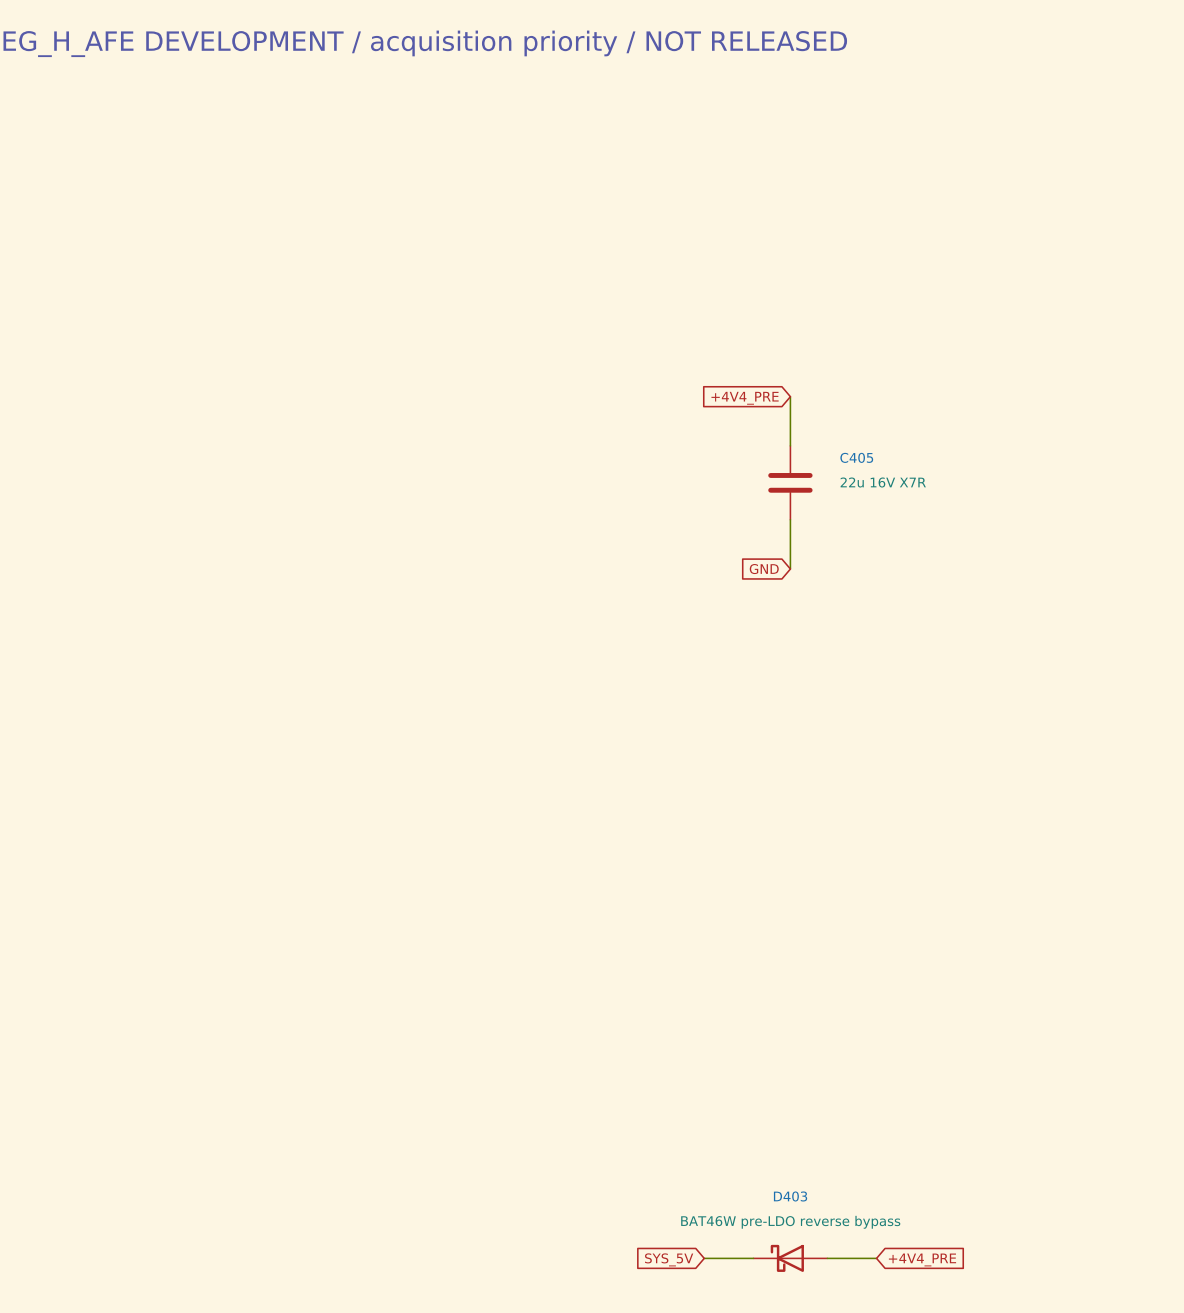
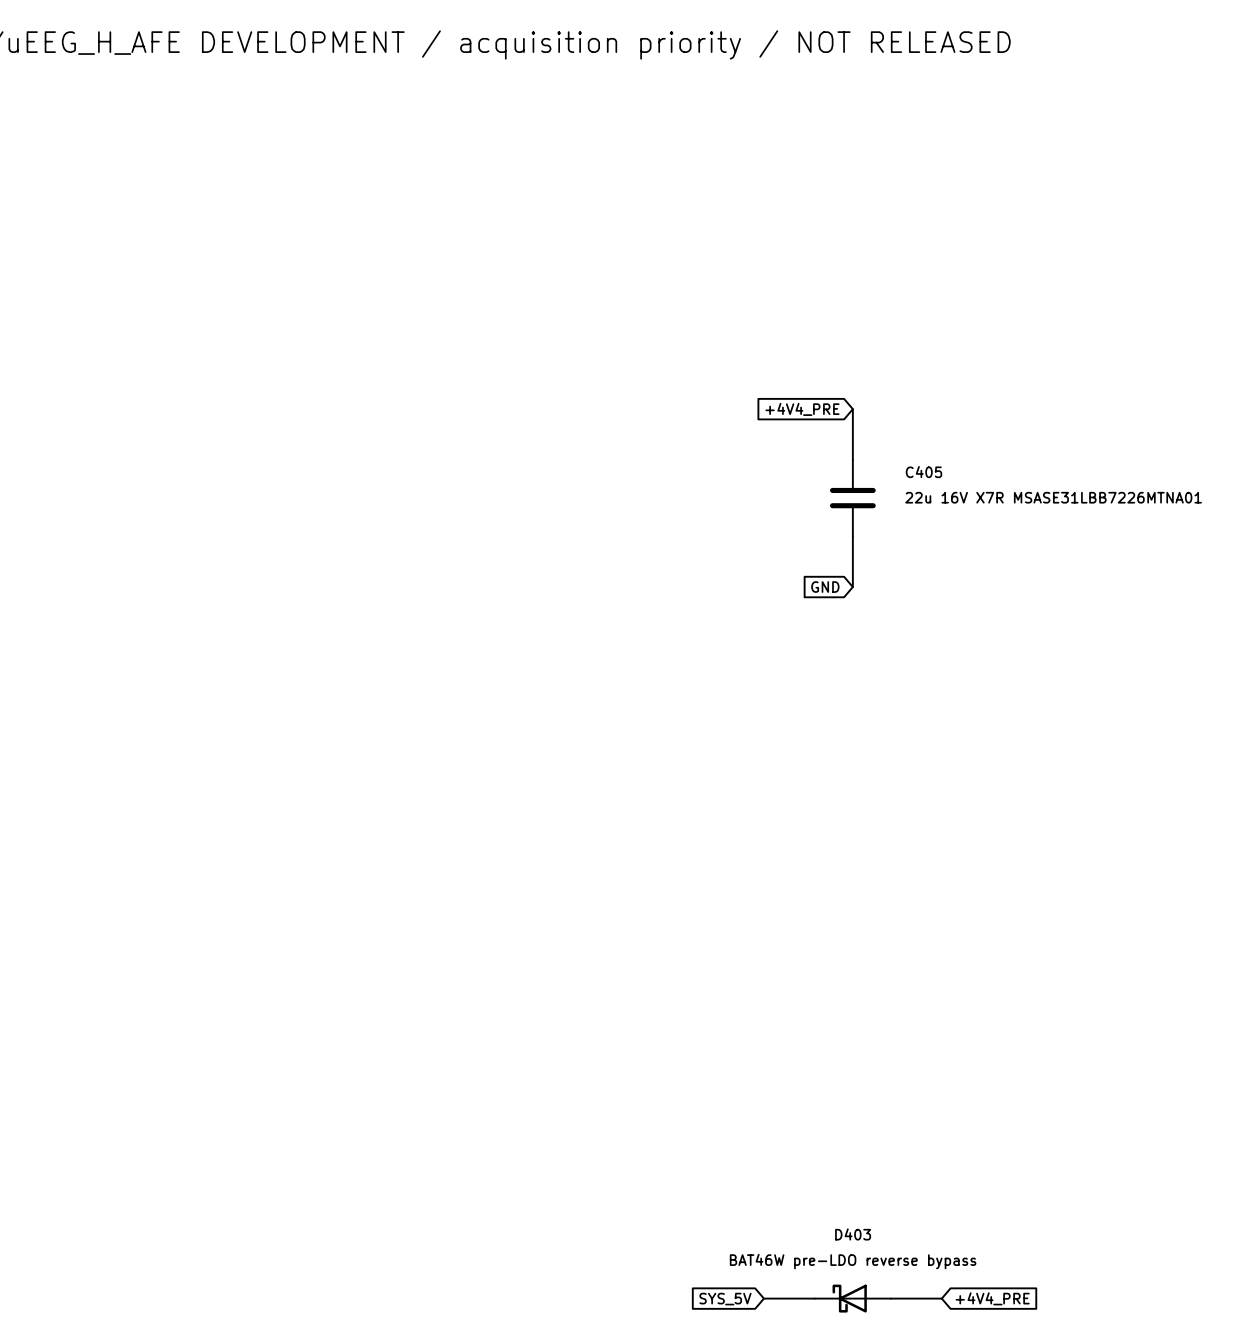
C405 value: 22u 16V X7R (883, 482) -> 22u 16V X7R MSASE31LBB7226MTNA01 (1053, 497)

